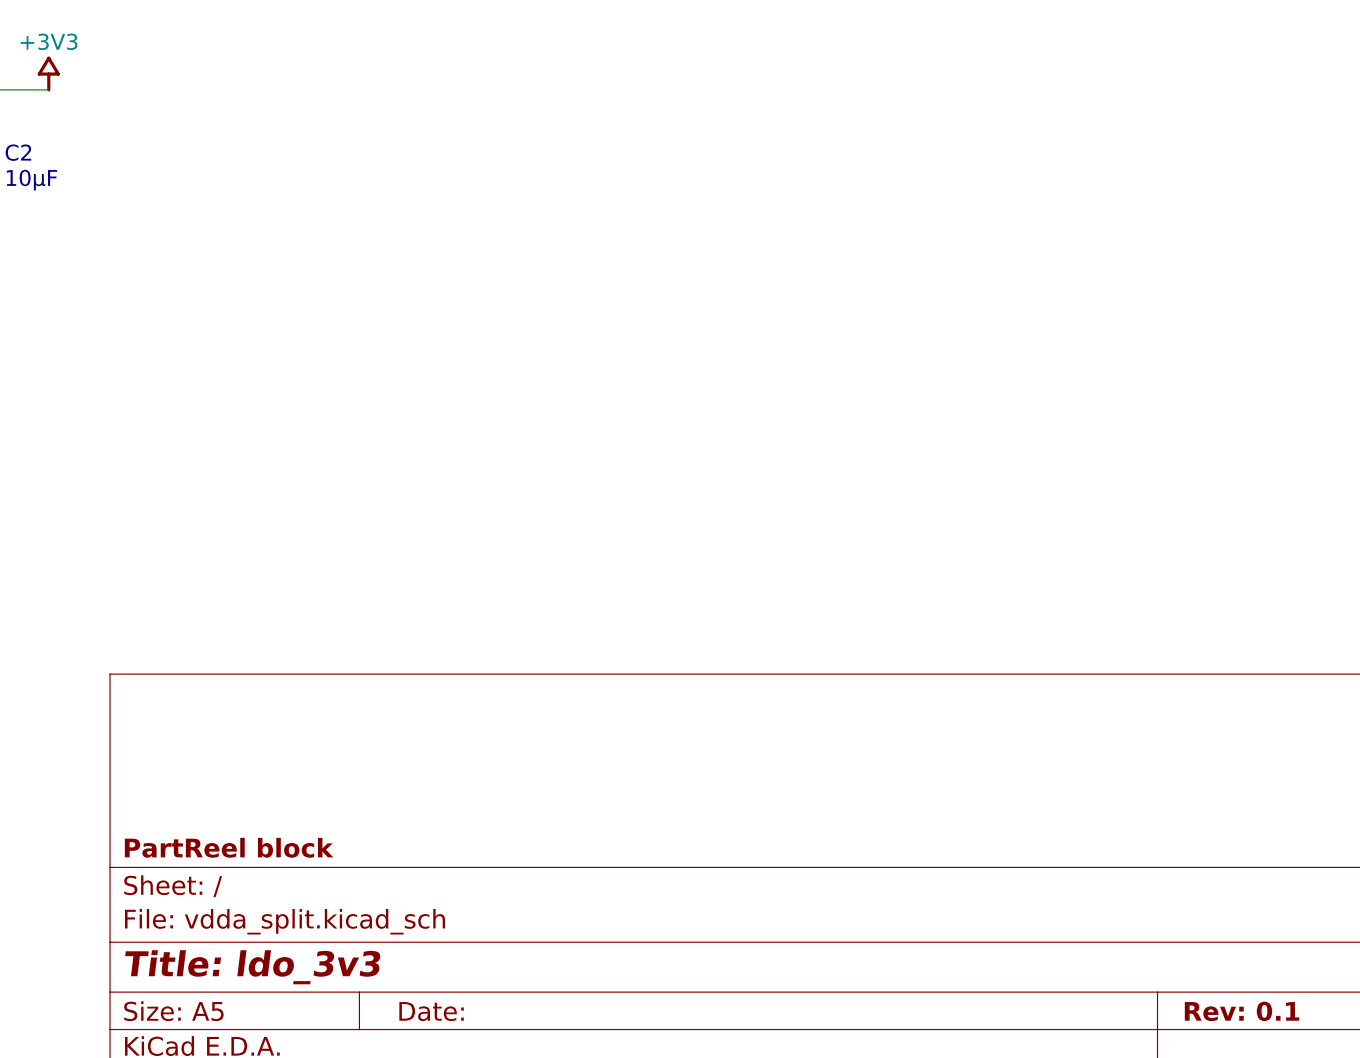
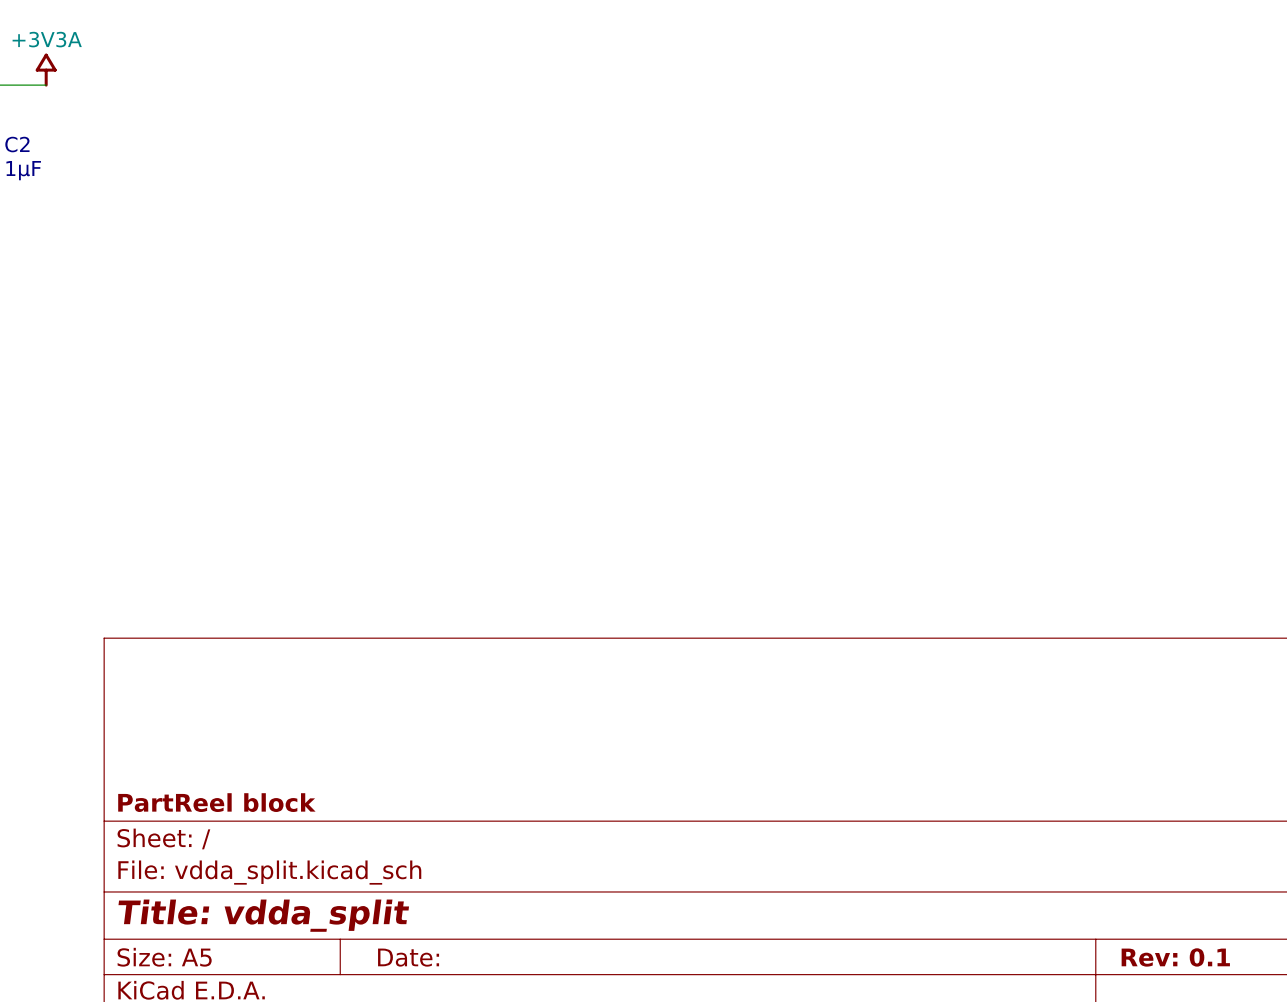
power symbol: +3V3 (48, 74) -> +3V3A (46, 70)
text: 10µF (31, 180) -> 1µF (23, 170)
title block: Title: ldo_3v3 (252, 967) -> Title: vdda_split (263, 915)

